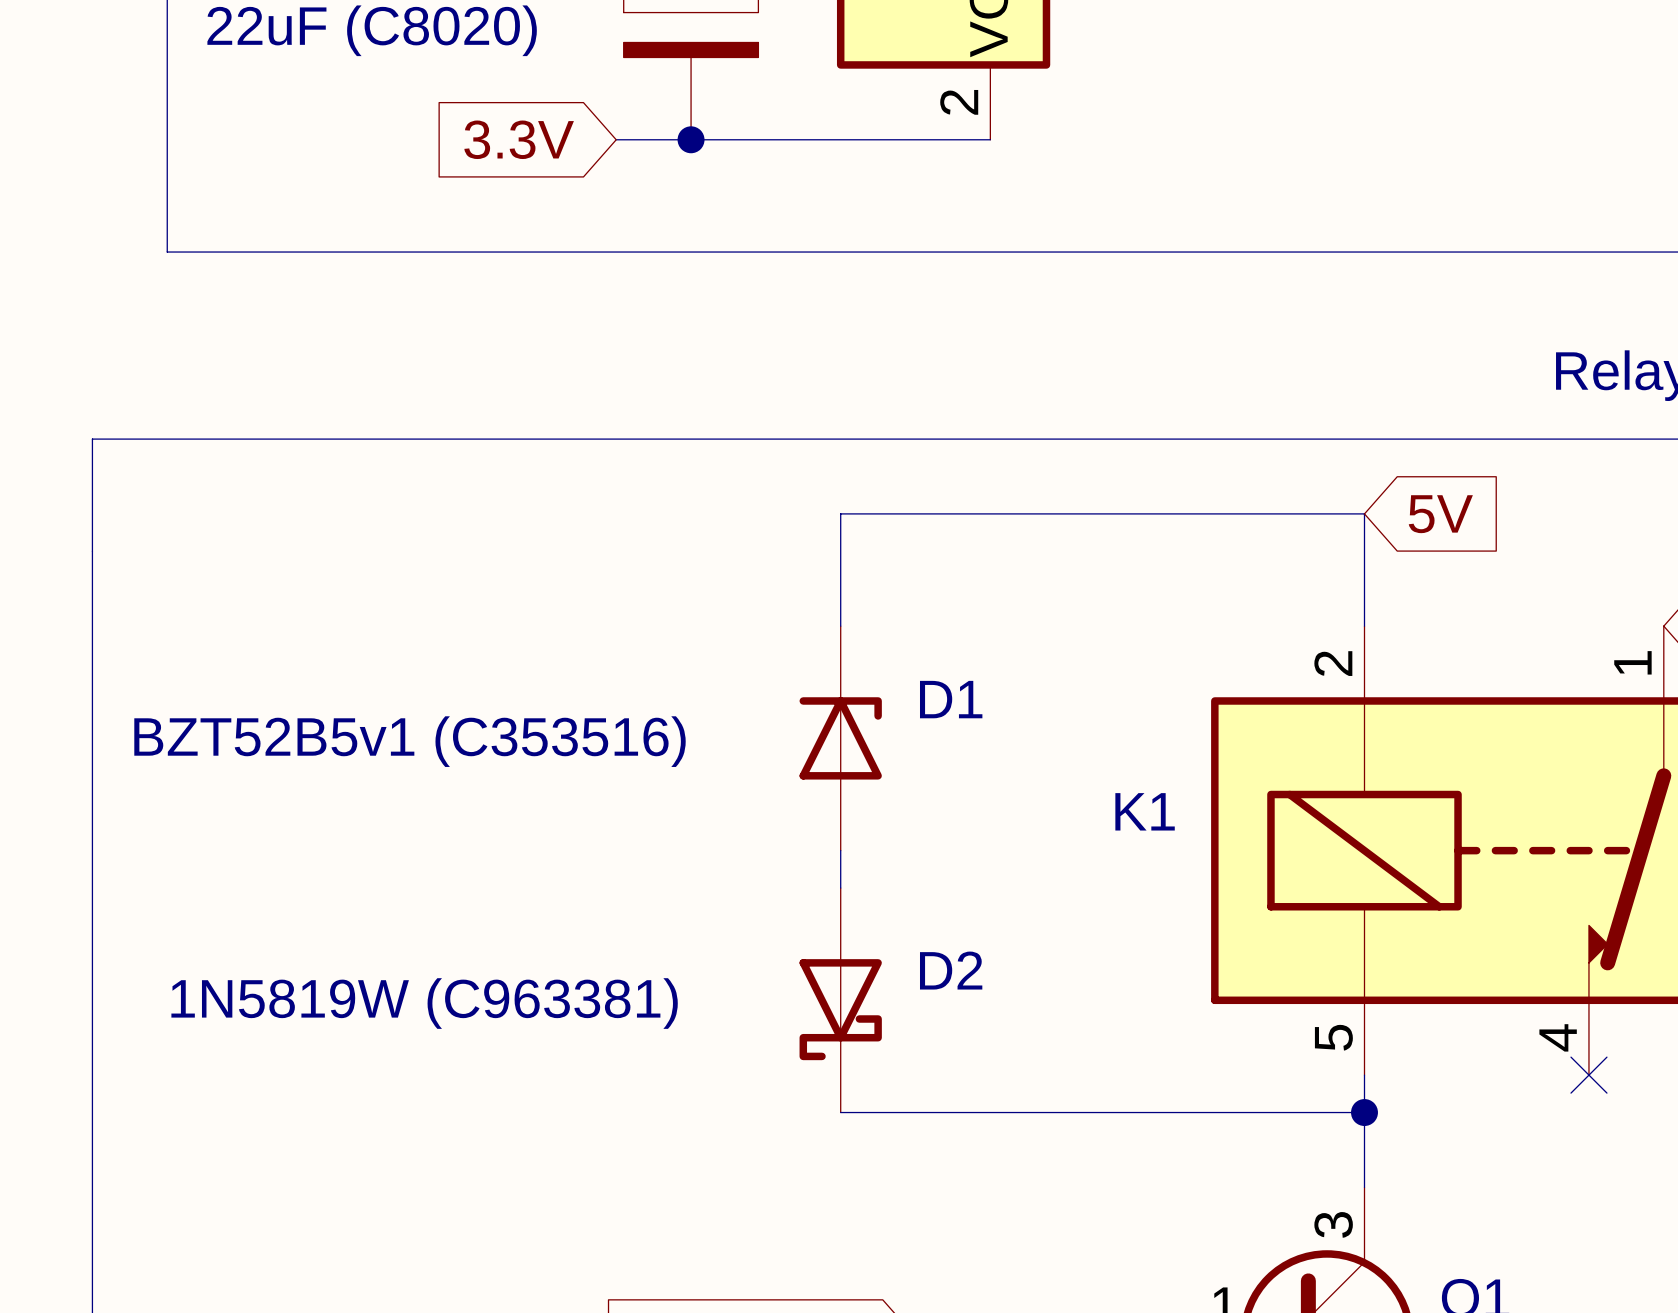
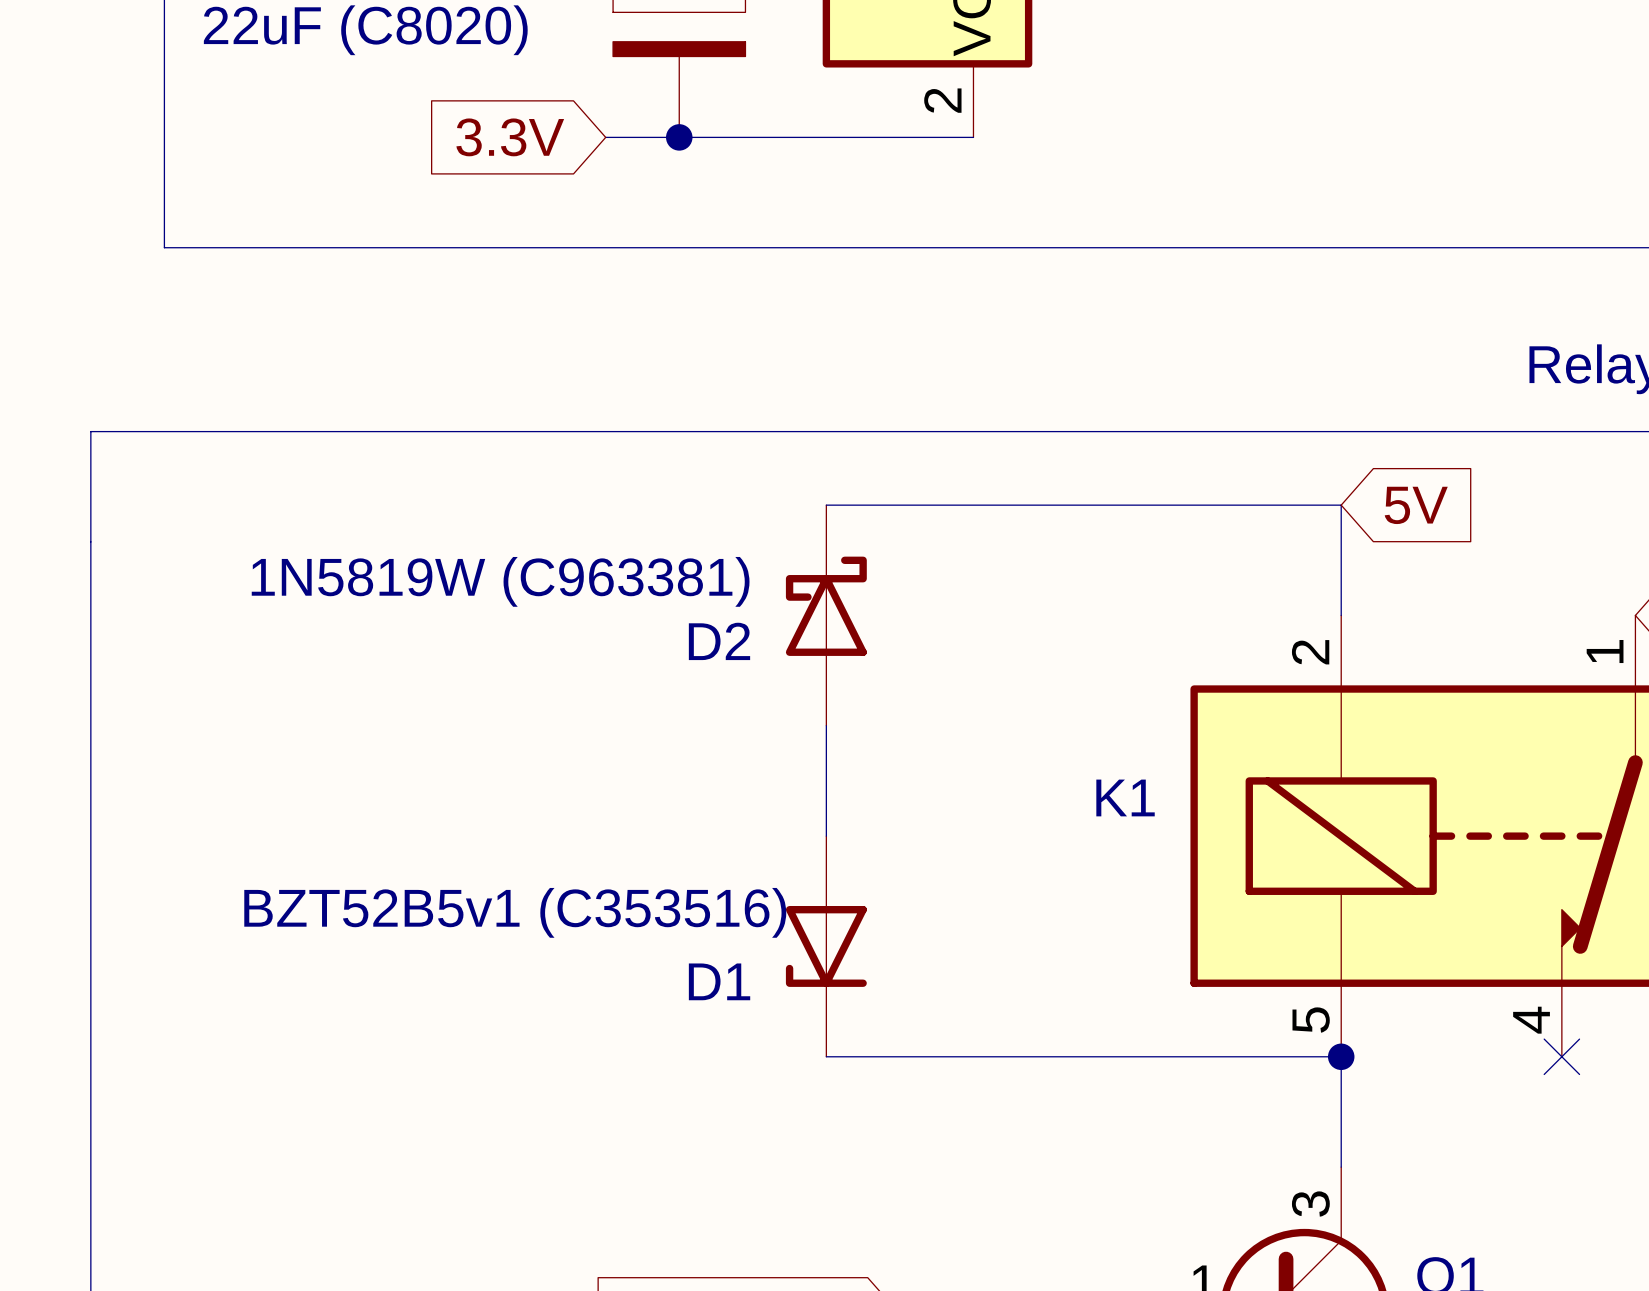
D1 rotation: 0° (840, 738) -> 180° (826, 946)
D1 position: (840, 738) -> (826, 946)
D2 position: (840, 1000) -> (826, 615)
D2 value position: 1N5819W (C963381) (424, 1003) -> 1N5819W (C963381) (500, 581)
D2 rotation: 0° (840, 1009) -> 180° (826, 606)
wire: (840, 1112) (1364, 1112) -> (826, 1056) (1341, 1056)
junction position: (1364, 1112) -> (1341, 1056)

